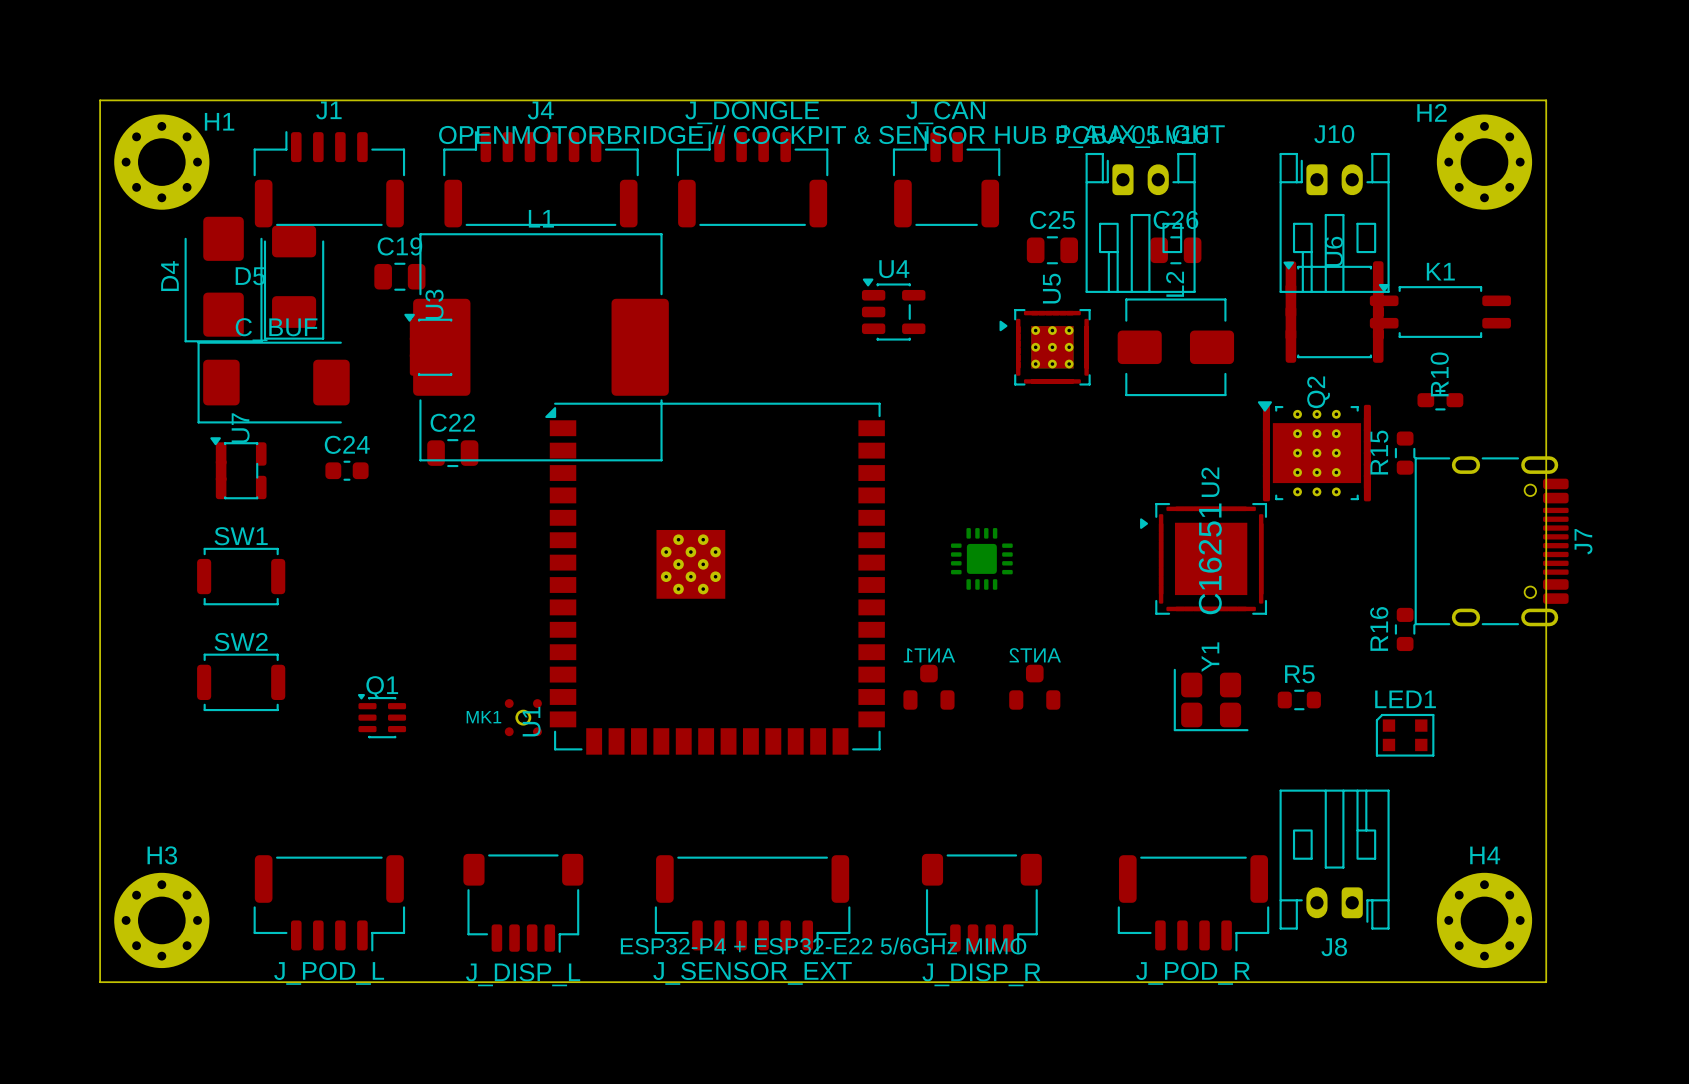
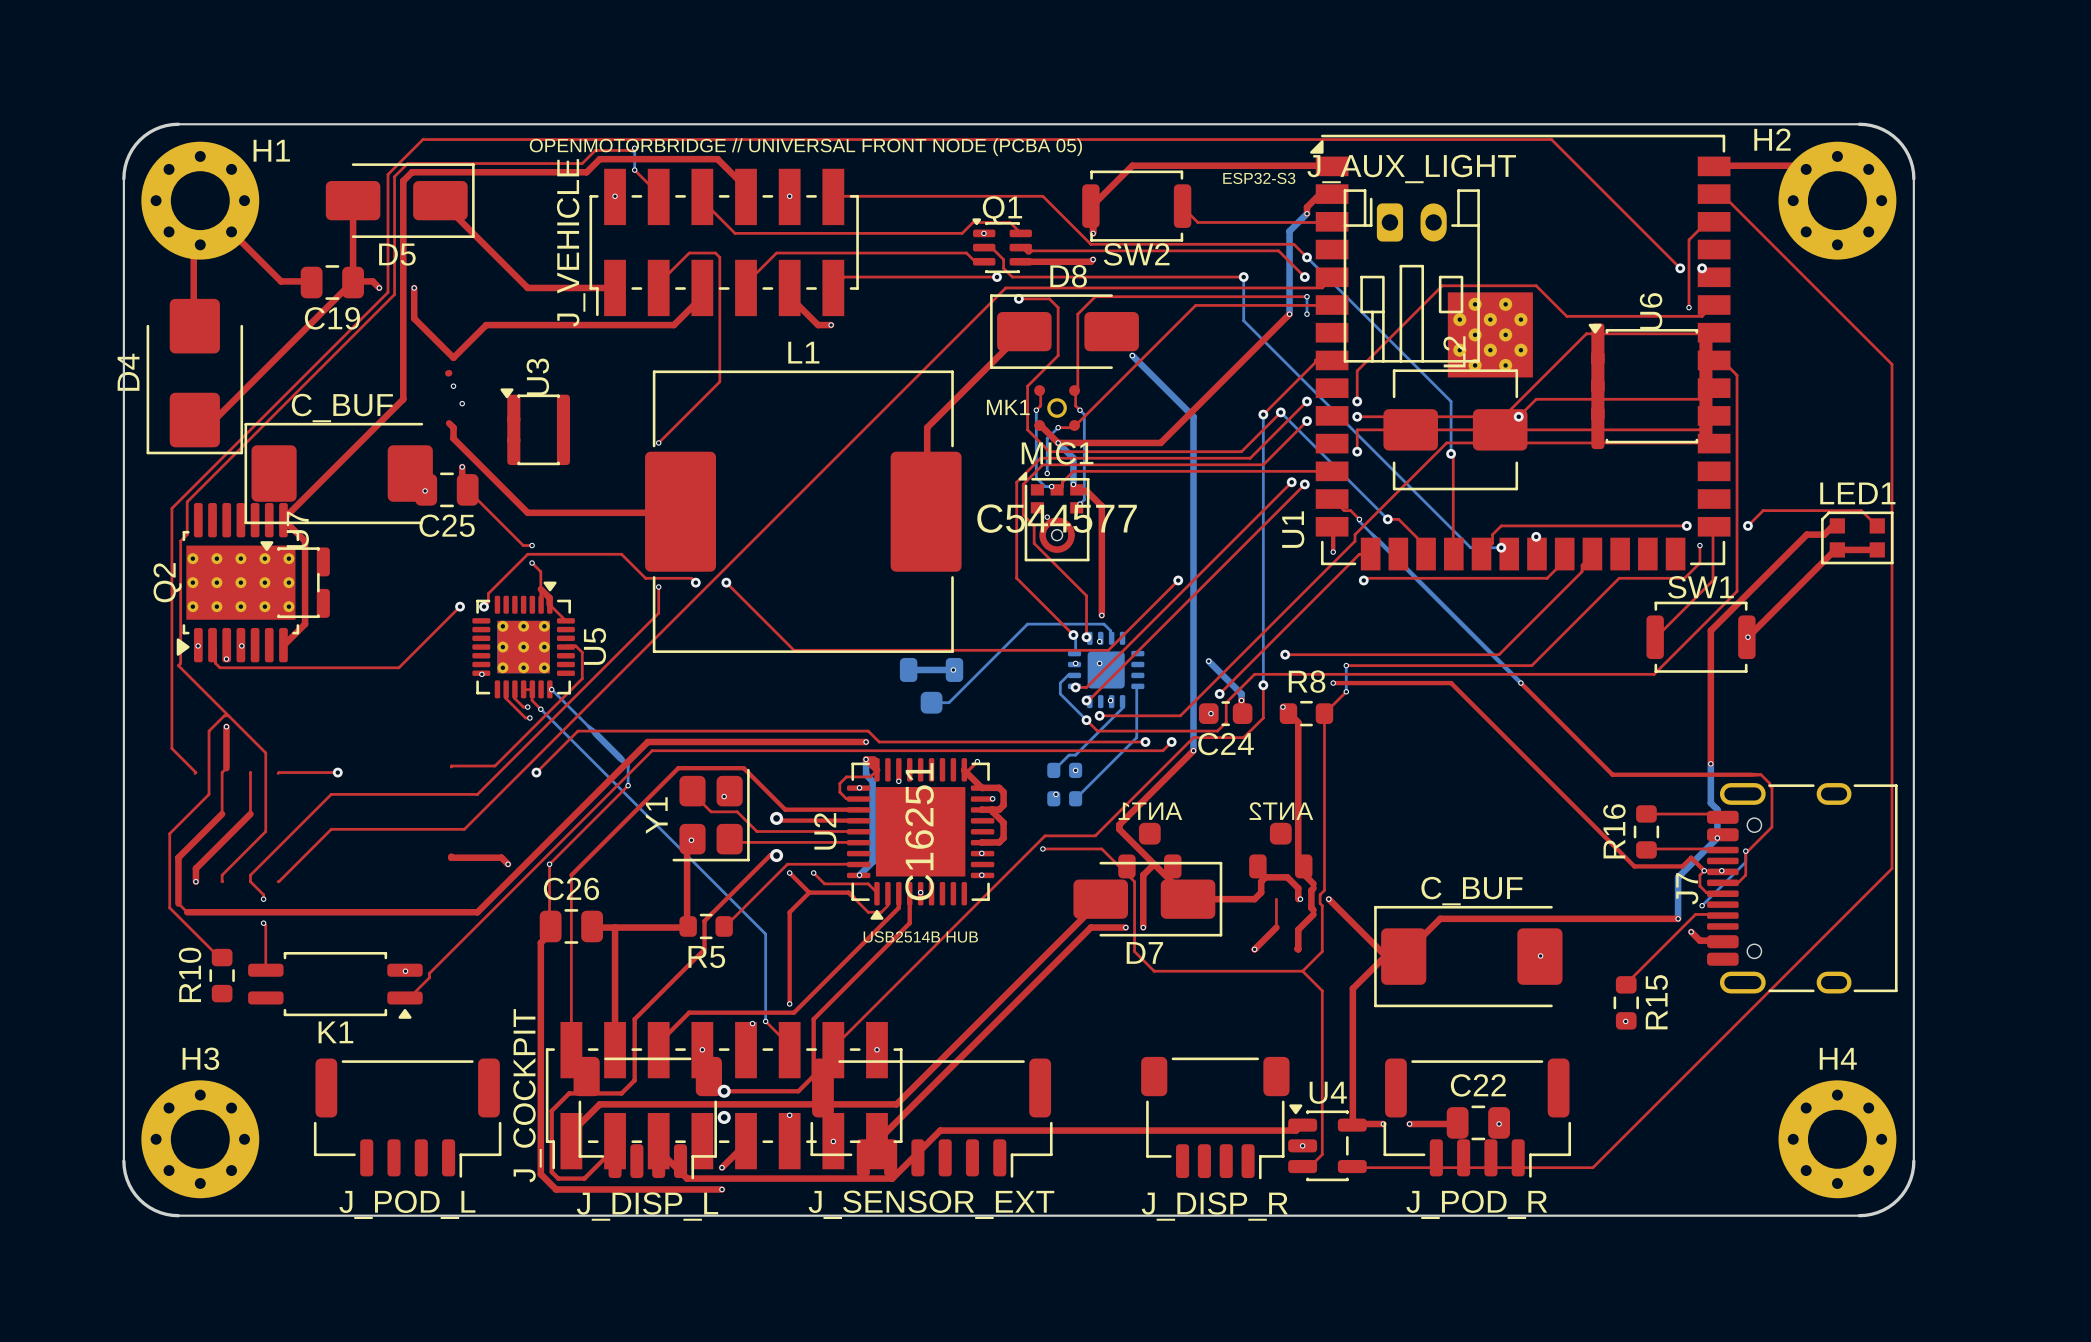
board edge: (144, 100) (100, 100) (100, 144) -> (178, 124) (154, 129) (139, 140) (126, 160) (123, 178)
board edge: (1502, 100) (1546, 100) (1546, 144) -> (1859, 124) (1882, 129) (1897, 140) (1910, 160) (1913, 178)
text: none -> OPENMOTORBRIDGE // UNIVERSAL FRONT NODE (PCBA 05) (805, 147)
top track: none -> (634, 148) (632, 150) (595, 150) (582, 163) (407, 163) (394, 176) (394, 294) (187, 501) (187, 534) (180, 541) (180, 663) (178, 665) (265, 752) (265, 831) (222, 875) (222, 881)
bottom track: none -> (634, 148) (634, 170)
via: none -> (634, 148)
text: OPENMOTORBRIDGE // COCKPIT & SENSOR HUB PCBA 05 v10 (823, 134) -> none
top track: none -> (1332, 166) (1132, 165) (1090, 207)
top track: none -> (1714, 166) (1802, 165) (1806, 170)
top track: none -> (634, 170) (658, 194) (658, 196)
via: none -> (634, 170)
text: none -> ESP32-S3 (1259, 178)
top track: none -> (1333, 194) (1320, 194) (1307, 207) (1307, 213)
top track: none -> (1713, 194) (1721, 194) (1892, 364) (1892, 868) (1592, 1167) (1352, 1166)
via: none -> (615, 196)
top track: none -> (702, 196) (702, 200) (735, 233) (962, 233) (973, 222) (1010, 222) (1021, 233)
via: none -> (789, 196)
top track: none -> (746, 196) (746, 187) (717, 159) (599, 159) (586, 172) (412, 172) (403, 181) (403, 399) (283, 519)
top track: none -> (833, 196) (1042, 196) (1090, 244) (1293, 244) (1307, 257)
top track: none -> (353, 200) (353, 282)
top track: none -> (440, 200) (527, 287) (615, 287)
top track: none -> (1182, 206) (1197, 222) (1332, 221)
bottom track: none -> (1307, 213) (1289, 231) (1289, 314)
via: none -> (1307, 213)
J1: (329, 179) -> none
J4: (540, 179) -> none
J_DONGLE: (752, 179) -> none
J_CAN: (946, 179) -> none
top track: none -> (1714, 221) (1706, 222) (1689, 239) (1689, 307)
top track: none -> (230, 231) (281, 281) (311, 282)
via: none -> (983, 233)
via: none -> (1093, 233)
J_VEHICLE: none -> (724, 242)
top track: none -> (200, 244) (193, 250) (194, 326)
top track: none -> (1020, 247) (1027, 253) (1031, 250) (1278, 250) (1304, 277)
top track: none -> (994, 250) (1003, 259) (1003, 268) (1012, 277) (1243, 277)
bottom track: none -> (1307, 257) (1451, 401) (1451, 453)
via: none -> (1307, 257)
top track: none -> (1093, 259) (1090, 261) (1020, 261)
via: none -> (1093, 259)
top track: none -> (983, 261) (975, 261) (966, 253) (776, 253) (746, 283) (746, 287)
top track: none -> (1680, 268) (1551, 139) (422, 139) (388, 174) (388, 292) (171, 508) (171, 748) (194, 773)
via: none -> (1680, 268)
via: none -> (1702, 268)
C25 name position: C25 (1052, 219) -> C25 (447, 525)
J10: (1334, 222) -> none
top track: none -> (997, 277) (844, 277) (833, 287)
via: none -> (997, 277)
bottom track: none -> (1243, 277) (1243, 320) (1470, 547) (1501, 547)
via: none -> (1243, 277)
via: none -> (1304, 277)
top track: none -> (1332, 277) (1322, 287) (1005, 287) (464, 829) (331, 829) (278, 881)
D5 footprint: [263, 225, 325, 340] -> [325, 163, 475, 238]
top track: none -> (379, 287) (372, 281) (353, 281) (213, 421) (193, 421) (194, 420)
via: none -> (379, 287)
top track: none -> (414, 287) (414, 318) (453, 357) (486, 325) (673, 325) (702, 296) (702, 287)
via: none -> (414, 287)
top track: none -> (658, 287) (658, 283) (689, 253) (715, 253) (719, 257) (719, 381) (658, 442)
top track: none -> (789, 287) (789, 296) (818, 325) (831, 325)
top track: none -> (1307, 296) (1095, 296) (1077, 314) (1077, 388) (1075, 390)
bottom track: none -> (1307, 296) (1307, 314)
via: none -> (1307, 296)
top track: none -> (1018, 298) (1049, 298) (1058, 307) (1058, 355) (1027, 386) (1027, 429) (1049, 451) (1241, 451) (1280, 412)
via: none -> (1018, 298)
C19 name position: C19 (399, 246) -> C19 (332, 318)
top track: none -> (1332, 304) (1195, 305) (1073, 427) (1058, 427)
top track: none -> (1714, 304) (1702, 316) (1566, 316) (1536, 285) (1442, 285) (1357, 370) (1357, 401)
via: none -> (1689, 307)
C25 position: (1052, 250) -> (446, 489)
C26 position: (1175, 250) -> (571, 926)
top track: none -> (1289, 314) (1160, 442) (1058, 442) (1039, 425)
via: none -> (1289, 314)
via: none -> (1307, 314)
via: none -> (831, 325)
top track: none -> (1024, 331) (927, 427) (927, 512) (926, 511)
D8: none -> (1064, 331)
top track: none -> (1714, 332) (1586, 333) (1503, 416) (1357, 416)
D5 name position: D5 (250, 276) -> D5 (397, 254)
C19 position: (399, 276) -> (332, 282)
D4 position: (223, 279) -> (194, 376)
bottom track: none -> (1132, 355) (1193, 416) (1193, 750)
via: none -> (1132, 355)
U5 name position: U5 (1051, 288) -> U5 (595, 646)
top track: none -> (1332, 360) (1315, 360) (1315, 362) (1263, 414)
top track: none -> (1714, 360) (1721, 360) (1737, 375) (1737, 591) (1654, 674) (1254, 674) (1226, 702) (1226, 722) (1217, 731) (1097, 731) (1086, 720)
top track: none -> (449, 373) (448, 373)
U4 position: (893, 309) -> (1327, 1142)
U5 footprint: [999, 309, 1091, 386] -> [472, 581, 575, 699]
K1 rotation: 0° (1440, 310) -> 180° (335, 985)
K1 position: (1440, 310) -> (335, 985)
via: none -> (453, 386)
top track: none -> (1714, 388) (1702, 399) (1536, 399) (1518, 416)
top track: none -> (1039, 390) (1040, 405) (1036, 410)
top track: none -> (1075, 390) (1075, 405) (1079, 410)
top track: none -> (1307, 401) (1250, 458) (1040, 458) (1016, 482) (1016, 578) (1073, 635)
via: none -> (1307, 401)
via: none -> (1357, 401)
via: none -> (462, 403)
bottom track: none -> (1036, 410) (1036, 477) (1045, 486) (1051, 486)
via: none -> (1036, 410)
bottom track: none -> (1079, 410) (1084, 414) (1084, 499) (1079, 504)
via: none -> (1079, 410)
bottom track: none -> (1280, 412) (1387, 519)
via: none -> (1280, 412)
bottom track: none -> (1263, 414) (1263, 685)
via: none -> (1263, 414)
top track: none -> (1714, 415) (1699, 429) (1357, 429) (1357, 451)
via: none -> (1357, 416)
via: none -> (1518, 416)
top track: none -> (1307, 421) (1263, 464) (1042, 464) (1023, 484) (1023, 514) (1034, 525) (1034, 543) (1086, 595) (1086, 637)
via: none -> (1307, 421)
top track: none -> (448, 423) (453, 427) (453, 438) (527, 512) (680, 511)
bottom track: none -> (1058, 427) (1047, 438) (1047, 473)
via: none -> (1058, 427)
L1 position: (540, 347) -> (803, 511)
via: none -> (658, 442)
bottom track: none -> (1058, 442) (1073, 458) (1073, 484)
via: none -> (1058, 442)
top track: none -> (1714, 443) (1446, 442) (1355, 534) (1355, 541) (1180, 715) (1099, 715)
via: none -> (1357, 451)
top track: none -> (1451, 453) (1453, 456) (1453, 554)
via: none -> (1451, 453)
R10 name position: R10 (1439, 374) -> R10 (190, 974)
top track: none -> (462, 466) (462, 474)
via: none -> (462, 466)
top track: none -> (1333, 471) (1073, 471) (1062, 482) (1062, 486)
via: none -> (1047, 473)
top track: none -> (1291, 482) (1086, 687) (1075, 687)
via: none -> (1291, 482)
R10 footprint: [1417, 389, 1464, 411] -> [209, 948, 235, 1003]
via: none -> (1073, 484)
top track: none -> (1304, 484) (1088, 700) (1086, 700)
via: none -> (1304, 484)
Q2 name position: Q2 (1318, 392) -> Q2 (167, 582)
via: none -> (1051, 486)
top track: none -> (467, 489) (523, 545) (532, 545)
top track: none -> (1076, 489) (1075, 490) (1086, 490) (1101, 506) (1101, 615)
via: none -> (425, 490)
Q2 footprint: [1257, 401, 1371, 502] -> [176, 502, 300, 663]
top track: none -> (1332, 499) (1344, 510) (1350, 510) (1359, 519)
via: none -> (1079, 504)
via: none -> (1047, 517)
MIC1: none -> (1054, 516)
top track: none -> (283, 519) (305, 541) (305, 624) (283, 645)
bottom track: none -> (1359, 519) (1359, 521) (1520, 683)
via: none -> (1359, 519)
top track: none -> (1387, 519) (1398, 519) (1427, 547) (1426, 554)
via: none -> (1387, 519)
top track: none -> (1686, 525) (1501, 525) (1492, 534) (1492, 543) (1481, 554)
via: none -> (1686, 525)
top track: none -> (1747, 525) (1763, 510) (1861, 510) (1877, 525)
via: none -> (1747, 525)
top track: none -> (1837, 525) (1833, 525) (1824, 534) (1806, 534) (1710, 630) (1710, 763)
top track: none -> (1332, 526) (1333, 552)
top track: none -> (1714, 526) (1713, 580) (1655, 637)
via: none -> (1536, 536)
via: none -> (532, 545)
top track: none -> (1699, 545) (1699, 563) (1684, 578) (1619, 578) (1531, 665) (1346, 665)
via: none -> (1699, 545)
via: none -> (1501, 547)
C24 name position: C24 (347, 444) -> C24 (1226, 744)
top track: none -> (1877, 549) (1835, 549) (1746, 637)
via: none -> (1333, 552)
top track: none -> (1370, 554) (1359, 554) (1219, 693)
top track: none -> (1564, 554) (1564, 560) (1547, 578) (1365, 578) (1363, 580)
top track: none -> (1592, 554) (1582, 565) (1582, 571) (1499, 654) (1285, 654)
R15 name position: R15 (1379, 452) -> R15 (1656, 1002)
C22 position: (452, 453) -> (1478, 1122)
R15 position: (1405, 453) -> (1626, 1002)
top track: none -> (532, 563) (540, 571) (540, 604)
via: none -> (532, 563)
top track: none -> (1178, 580) (1108, 650) (794, 650) (726, 582)
via: none -> (1178, 580)
via: none -> (1363, 580)
C24 position: (346, 470) -> (1225, 713)
top track: none -> (695, 582) (691, 578) (645, 578) (621, 554) (527, 554) (488, 593) (488, 602) (484, 606)
via: none -> (695, 582)
via: none -> (726, 582)
top track: none -> (658, 587) (658, 613) (477, 794) (331, 794) (250, 875) (250, 881) (263, 894) (263, 899)
via: none -> (658, 587)
top track: none -> (540, 589) (549, 597) (549, 604) (565, 620)
U2 name position: U2 (1210, 482) -> U2 (825, 831)
top track: none -> (460, 606) (398, 667) (219, 667) (215, 663) (215, 648) (212, 645)
via: none -> (460, 606)
via: none -> (484, 606)
via: none -> (1101, 615)
U2 footprint: [1140, 503, 1268, 615] -> [846, 758, 995, 920]
bottom track: none -> (1073, 635) (1075, 637) (1074, 653)
via: none -> (1073, 635)
via: none -> (1086, 637)
via: none -> (1747, 637)
bottom track: none -> (1111, 638) (1110, 639) (1110, 630) (1104, 624) (1027, 624) (949, 702) (931, 702)
via: none -> (1099, 641)
via: none -> (198, 645)
via: none -> (241, 645)
top track: none -> (565, 647) (575, 645) (582, 652) (582, 678) (494, 766) (451, 767)
via: none -> (1285, 654)
via: none -> (226, 659)
bottom track: none -> (1208, 661) (1241, 693) (1241, 700)
via: none -> (1208, 661)
via: none -> (1075, 663)
via: none -> (1099, 663)
bottom track: none -> (1346, 665) (1346, 691)
via: none -> (1346, 665)
bottom track: none -> (908, 669) (954, 669)
via: none -> (953, 669)
J7 rotation: 0° (1491, 541) -> 180° (1802, 888)
J7 position: (1491, 541) -> (1802, 888)
via: none -> (481, 674)
bottom track: none -> (1074, 675) (1075, 674) (1069, 674) (1060, 683) (1060, 693) (1086, 720)
top track: none -> (1333, 683) (1451, 683) (1634, 866) (1682, 866) (1691, 857) (1704, 870)
via: none -> (1333, 683)
top track: none -> (1520, 683) (1612, 774) (1761, 774) (1771, 787) (1771, 827) (1745, 853) (1745, 875) (1737, 883) (1721, 883) (1722, 882)
via: none -> (1520, 683)
top track: none -> (1263, 685) (1263, 717) (1243, 737) (1193, 737) (1095, 835) (1045, 835) (833, 1047) (833, 1049)
via: none -> (1263, 685)
part: none -> (931, 685)
bottom track: none -> (1137, 686) (1136, 737) (1075, 798)
via: none -> (1075, 687)
top track: none -> (505, 689) (505, 698) (525, 717) (529, 717)
top track: none -> (514, 689) (514, 698) (523, 707) (527, 707)
top track: none -> (523, 689) (532, 689) (532, 700) (540, 709)
bottom track: none -> (551, 689) (628, 766) (628, 785)
via: none -> (551, 689)
part position: (981, 558) -> (1106, 669)
top track: none -> (1346, 691) (1324, 713) (1324, 890) (1320, 894) (1320, 903) (1322, 905) (1322, 951) (1302, 971)
via: none -> (1346, 691)
via: none -> (1219, 693)
via: none -> (1086, 700)
via: none -> (1110, 700)
via: none -> (1241, 700)
bottom track: none -> (1122, 701) (1123, 700) (1123, 707) (1075, 755) (1069, 755) (1053, 770)
via: none -> (527, 707)
top track: none -> (1282, 707) (1298, 722) (1298, 868) (1313, 883) (1311, 890) (1311, 907) (1313, 914) (1298, 929) (1297, 948)
via: none -> (1282, 707)
bottom track: none -> (540, 709) (765, 934) (765, 1021)
via: none -> (540, 709)
SW1 position: (241, 576) -> (1701, 637)
via: none -> (1210, 713)
R8: none -> (1306, 713)
top track: none -> (228, 715) (224, 715) (209, 731) (209, 794) (169, 833) (169, 907) (219, 958) (222, 957)
U1 position: (715, 578) -> (1520, 352)
via: none -> (1099, 715)
via: none -> (529, 717)
via: none -> (1086, 720)
top track: none -> (226, 726) (226, 768) (222, 772) (222, 814) (178, 857) (178, 903) (187, 912) (477, 912) (647, 742) (866, 742)
via: none -> (226, 726)
via: none -> (866, 742)
top track: none -> (1145, 742) (879, 742) (868, 731) (577, 731) (536, 772)
via: none -> (1145, 742)
top track: none -> (1171, 742) (1162, 750) (652, 750) (429, 973) (429, 977) (409, 997) (404, 997)
via: none -> (1171, 742)
top track: none -> (1193, 750) (1119, 824) (1119, 829) (1189, 899)
via: none -> (1193, 750)
bottom track: none -> (866, 759) (866, 774) (872, 781) (872, 862) (859, 875)
via: none -> (866, 759)
top track: none -> (874, 759) (866, 759) (876, 770)
top track: none -> (977, 761) (965, 771)
via: none -> (977, 761)
bottom track: none -> (1710, 763) (1710, 803) (1717, 809) (1717, 838) (1678, 877) (1678, 918)
via: none -> (1710, 763)
top track: none -> (964, 769) (981, 787)
top track: none -> (876, 770) (870, 776) (846, 776) (839, 783) (839, 792) (846, 798) (858, 799)
via: none -> (1075, 770)
top track: none -> (250, 773) (250, 814) (195, 868) (194, 881)
top track: none -> (337, 772) (278, 773)
via: none -> (337, 772)
via: none -> (536, 772)
R16 position: (1405, 629) -> (1646, 831)
via: none -> (898, 781)
part: none -> (1064, 784)
top track: none -> (628, 785) (549, 864) (549, 925)
via: none -> (628, 785)
via: none -> (859, 787)
top track: none -> (981, 787) (999, 787) (1003, 792) (1003, 805) (999, 809) (982, 809)
top track: none -> (692, 791) (691, 792) (711, 811) (737, 811) (756, 831) (858, 831)
via: none -> (1055, 794)
SW2 name position: SW2 (241, 642) -> SW2 (1136, 254)
via: none -> (724, 796)
via: none -> (992, 798)
top track: none -> (858, 809) (785, 809) (743, 768) (678, 768) (571, 875) (571, 1049)
top track: none -> (992, 809) (1003, 822) (1003, 838) (999, 842) (982, 842)
Y1 name position: Y1 (1210, 657) -> Y1 (656, 815)
top track: none -> (1646, 813) (1719, 814) (1721, 818) (1722, 817)
via: none -> (776, 818)
top track: none -> (778, 820) (858, 820)
Y1 footprint: [1173, 668, 1249, 732] -> [672, 768, 750, 862]
R5 name position: R5 (1299, 674) -> R5 (706, 957)
top track: none -> (692, 839) (687, 844) (687, 927)
top track: none -> (729, 839) (732, 842) (858, 842)
via: none -> (1717, 838)
via: none -> (691, 840)
SW2 position: (241, 682) -> (1136, 206)
top track: none -> (1042, 848) (1101, 848) (1134, 881) (1134, 951) (1154, 971) (1302, 971)
via: none -> (1042, 848)
top track: none -> (1646, 849) (1722, 850)
bottom track: none -> (1745, 851) (1745, 862) (1702, 905)
via: none -> (1745, 851)
via: none -> (981, 853)
top track: none -> (776, 855) (770, 855) (704, 921) (704, 949) (634, 1019) (634, 1080) (621, 1093) (569, 1093) (551, 1110) (551, 1172) (558, 1178) (584, 1178) (615, 1148) (615, 1141)
via: none -> (776, 855)
top track: none -> (451, 856) (501, 857) (508, 864)
via: none -> (508, 864)
via: none -> (549, 864)
top track: none -> (858, 864) (787, 864) (724, 926)
top track: none -> (1154, 864) (1143, 875) (1143, 927)
R5 position: (1299, 699) -> (706, 926)
top track: none -> (1704, 870) (1699, 875) (1699, 886) (1706, 892) (1722, 893)
via: none -> (1704, 870)
via: none -> (1721, 870)
top track: none -> (789, 872) (809, 892)
via: none -> (789, 872)
top track: none -> (813, 872) (824, 883) (868, 883) (876, 893)
via: none -> (813, 872)
via: none -> (859, 875)
via: none -> (981, 875)
via: none -> (195, 881)
Q1 position: (381, 716) -> (1002, 245)
MK1 position: (523, 717) -> (1057, 408)
top track: none -> (809, 892) (789, 912) (789, 1003)
top track: none -> (809, 892) (848, 892) (868, 912) (881, 912) (887, 905)
top track: none -> (898, 892) (898, 907) (794, 1012) (689, 1012) (658, 1043) (658, 1049)
top track: none -> (909, 892) (909, 923) (813, 1019) (813, 1075) (798, 1091) (724, 1091)
via: none -> (920, 892)
via: none -> (263, 899)
top track: none -> (1100, 899) (896, 1104) (599, 1104) (571, 1132) (571, 1141)
D7: none -> (1147, 899)
top track: none -> (1188, 899) (1254, 899)
top track: none -> (1254, 899) (1261, 892) (1261, 881) (1265, 877) (1287, 877) (1298, 888) (1297, 899)
top track: none -> (1276, 899) (1276, 927) (1255, 948)
via: none -> (1300, 899)
top track: none -> (1328, 899) (1385, 955)
via: none -> (1328, 899)
via: none -> (1702, 905)
LED1 position: (1405, 735) -> (1857, 537)
top track: none -> (1722, 915) (1695, 914) (1626, 984)
top track: none -> (1678, 918) (1440, 918) (1403, 955)
via: none -> (1678, 918)
top track: none -> (263, 923) (265, 925) (265, 970)
via: none -> (263, 923)
top track: none -> (550, 926) (551, 931) (540, 942) (540, 1174) (556, 1189) (722, 1189)
top track: none -> (592, 926) (591, 927) (687, 927)
top track: none -> (615, 927) (615, 1050)
top track: none -> (1125, 927) (1090, 927) (876, 1141)
via: none -> (1125, 927)
via: none -> (1143, 927)
top track: none -> (1691, 931) (1699, 940) (1722, 941)
via: none -> (1691, 931)
text: none -> USB2514B HUB (920, 936)
via: none -> (1254, 949)
top track: none -> (1385, 955) (1352, 988) (1352, 1124)
C_BUF: none -> (1468, 956)
via: none -> (1540, 955)
via: none -> (405, 971)
top track: none -> (1302, 971) (1322, 990) (1322, 1154) (1309, 1167) (1302, 1166)
via: none -> (789, 1003)
top track: none -> (765, 1021) (789, 1045) (789, 1049)
via: none -> (765, 1021)
via: none -> (1625, 1021)
via: none -> (752, 1023)
via: none -> (702, 1049)
via: none -> (876, 1049)
J8: (1334, 859) -> none
via: none -> (724, 1091)
J_COCKPIT: none -> (724, 1095)
via: none -> (789, 1115)
via: none -> (724, 1117)
top track: none -> (1457, 1122) (1409, 1124)
top track: none -> (1302, 1125) (1296, 1130) (940, 1130) (892, 1178) (687, 1178) (658, 1150) (658, 1141)
top track: none -> (1352, 1124) (1383, 1124)
via: none -> (1383, 1124)
via: none -> (1409, 1124)
via: none -> (1499, 1124)
top track: none -> (746, 1141) (722, 1167)
via: none -> (833, 1141)
via: none -> (1302, 1145)
board edge: (100, 938) (100, 982) (144, 982) -> (123, 1161) (129, 1184) (139, 1199) (154, 1210) (178, 1215)
board edge: (1546, 938) (1546, 982) (1502, 982) -> (1913, 1161) (1908, 1184) (1897, 1199) (1882, 1210) (1859, 1215)
via: none -> (722, 1167)
text: ESP32-P4 + ESP32-E22 5/6GHz MIMO (823, 945) -> none
via: none -> (722, 1189)

